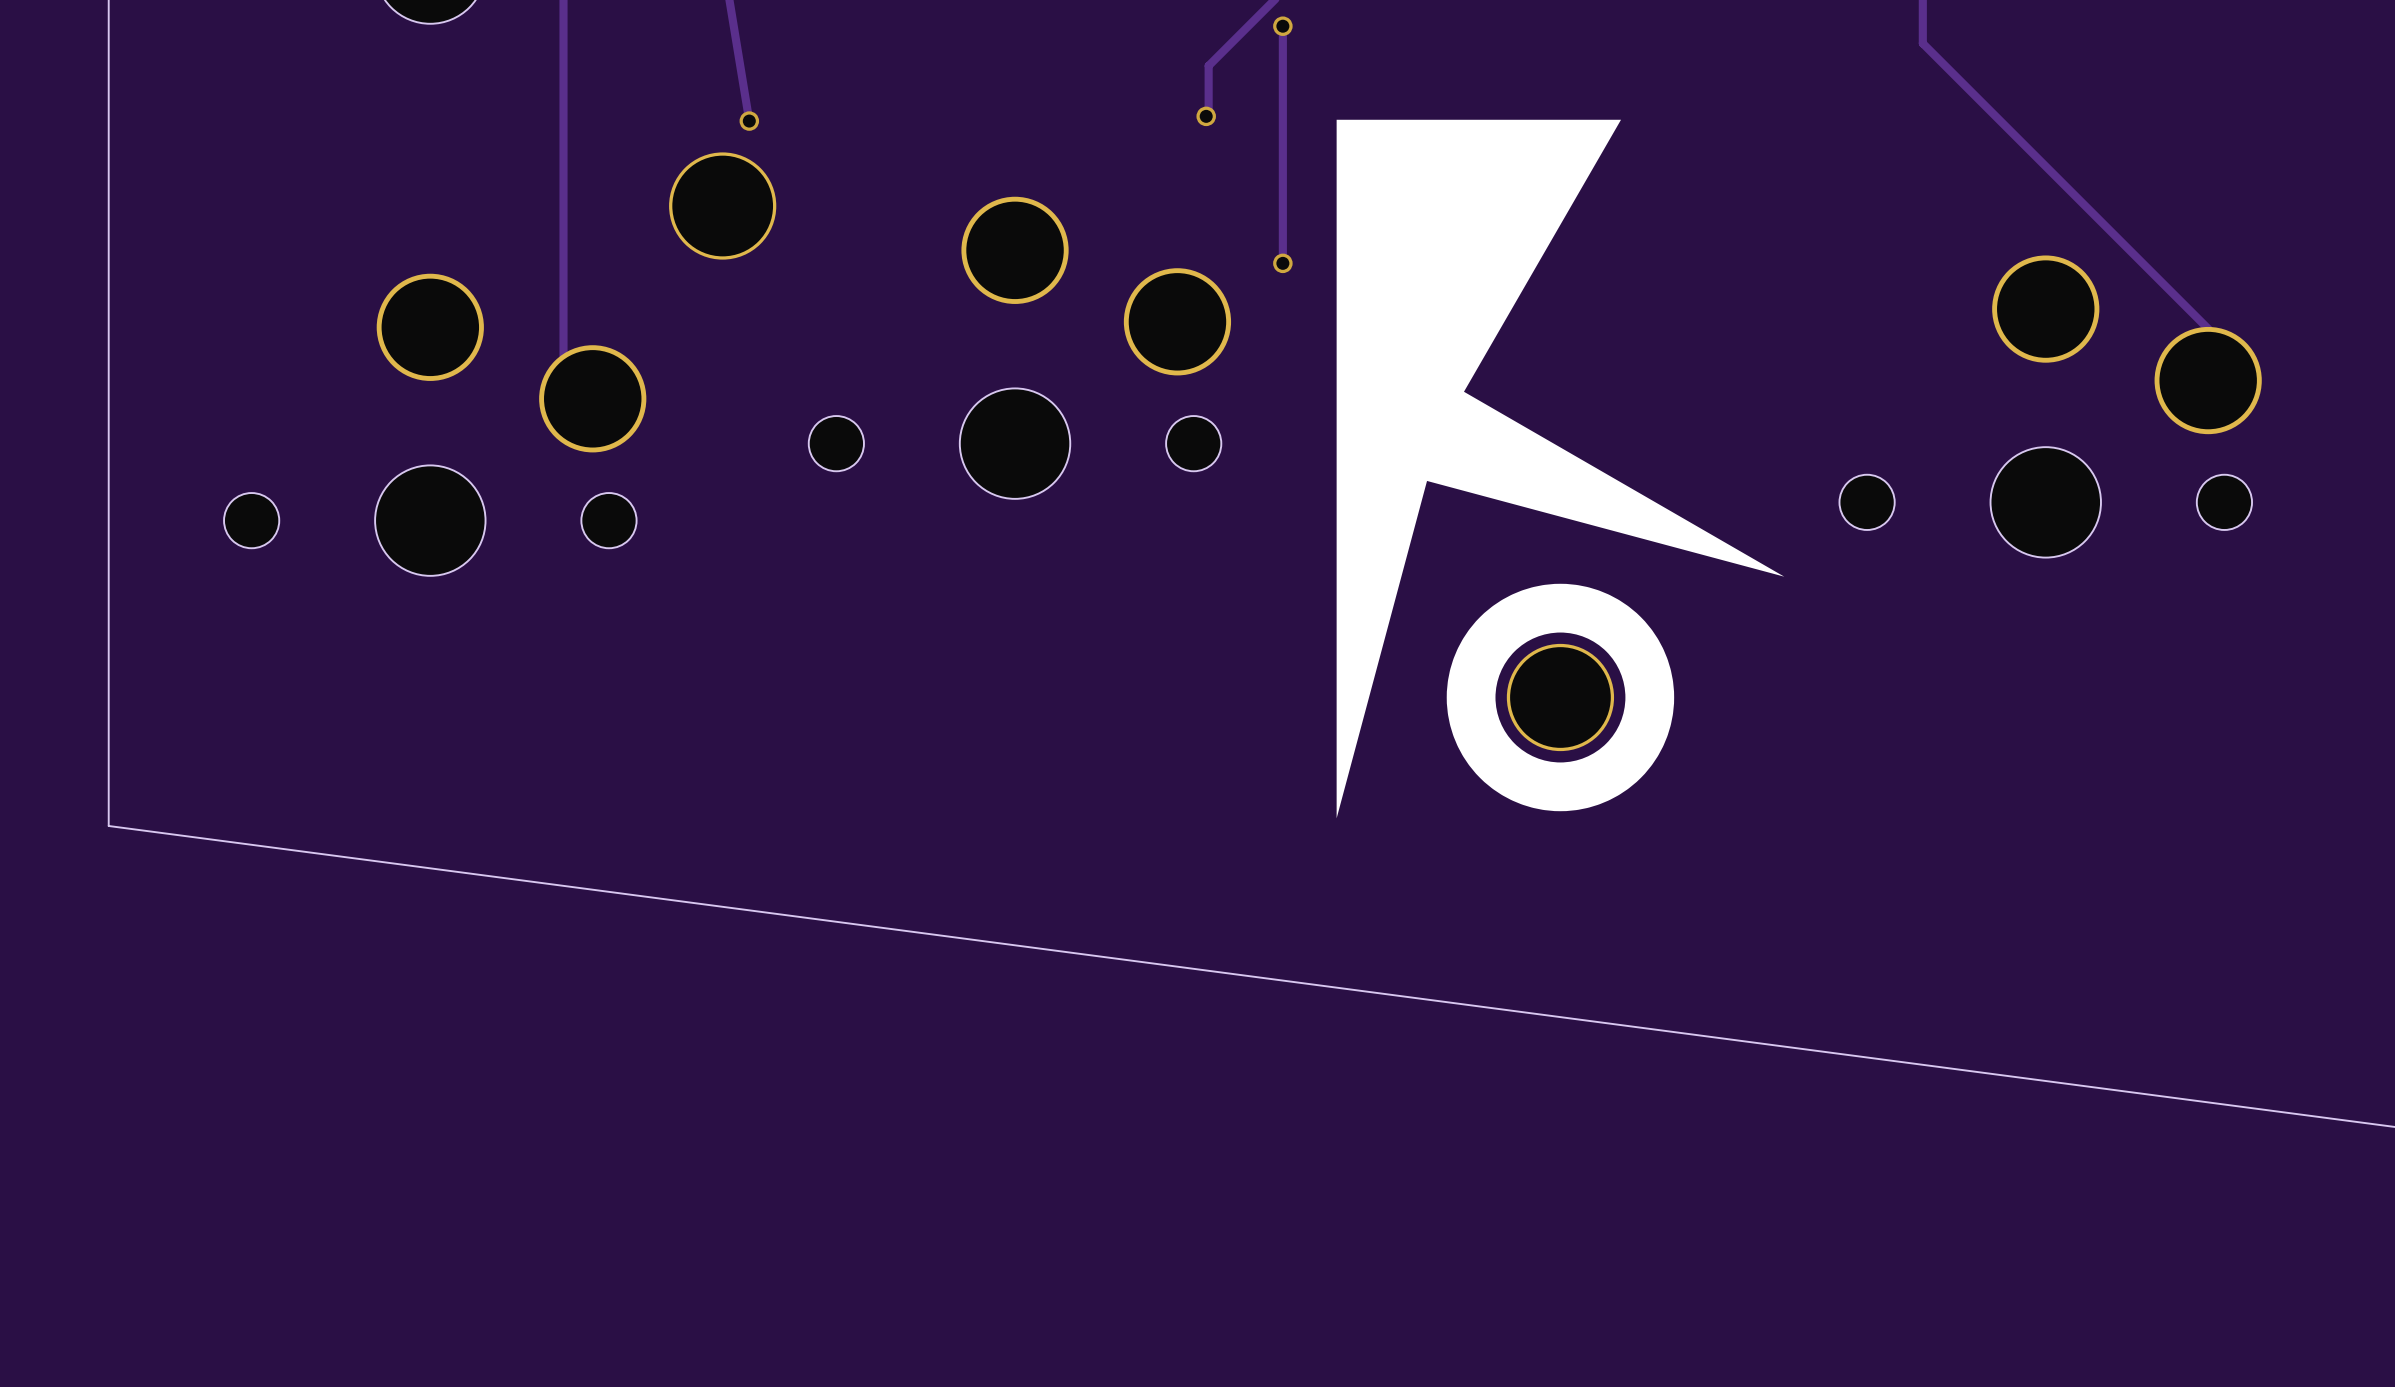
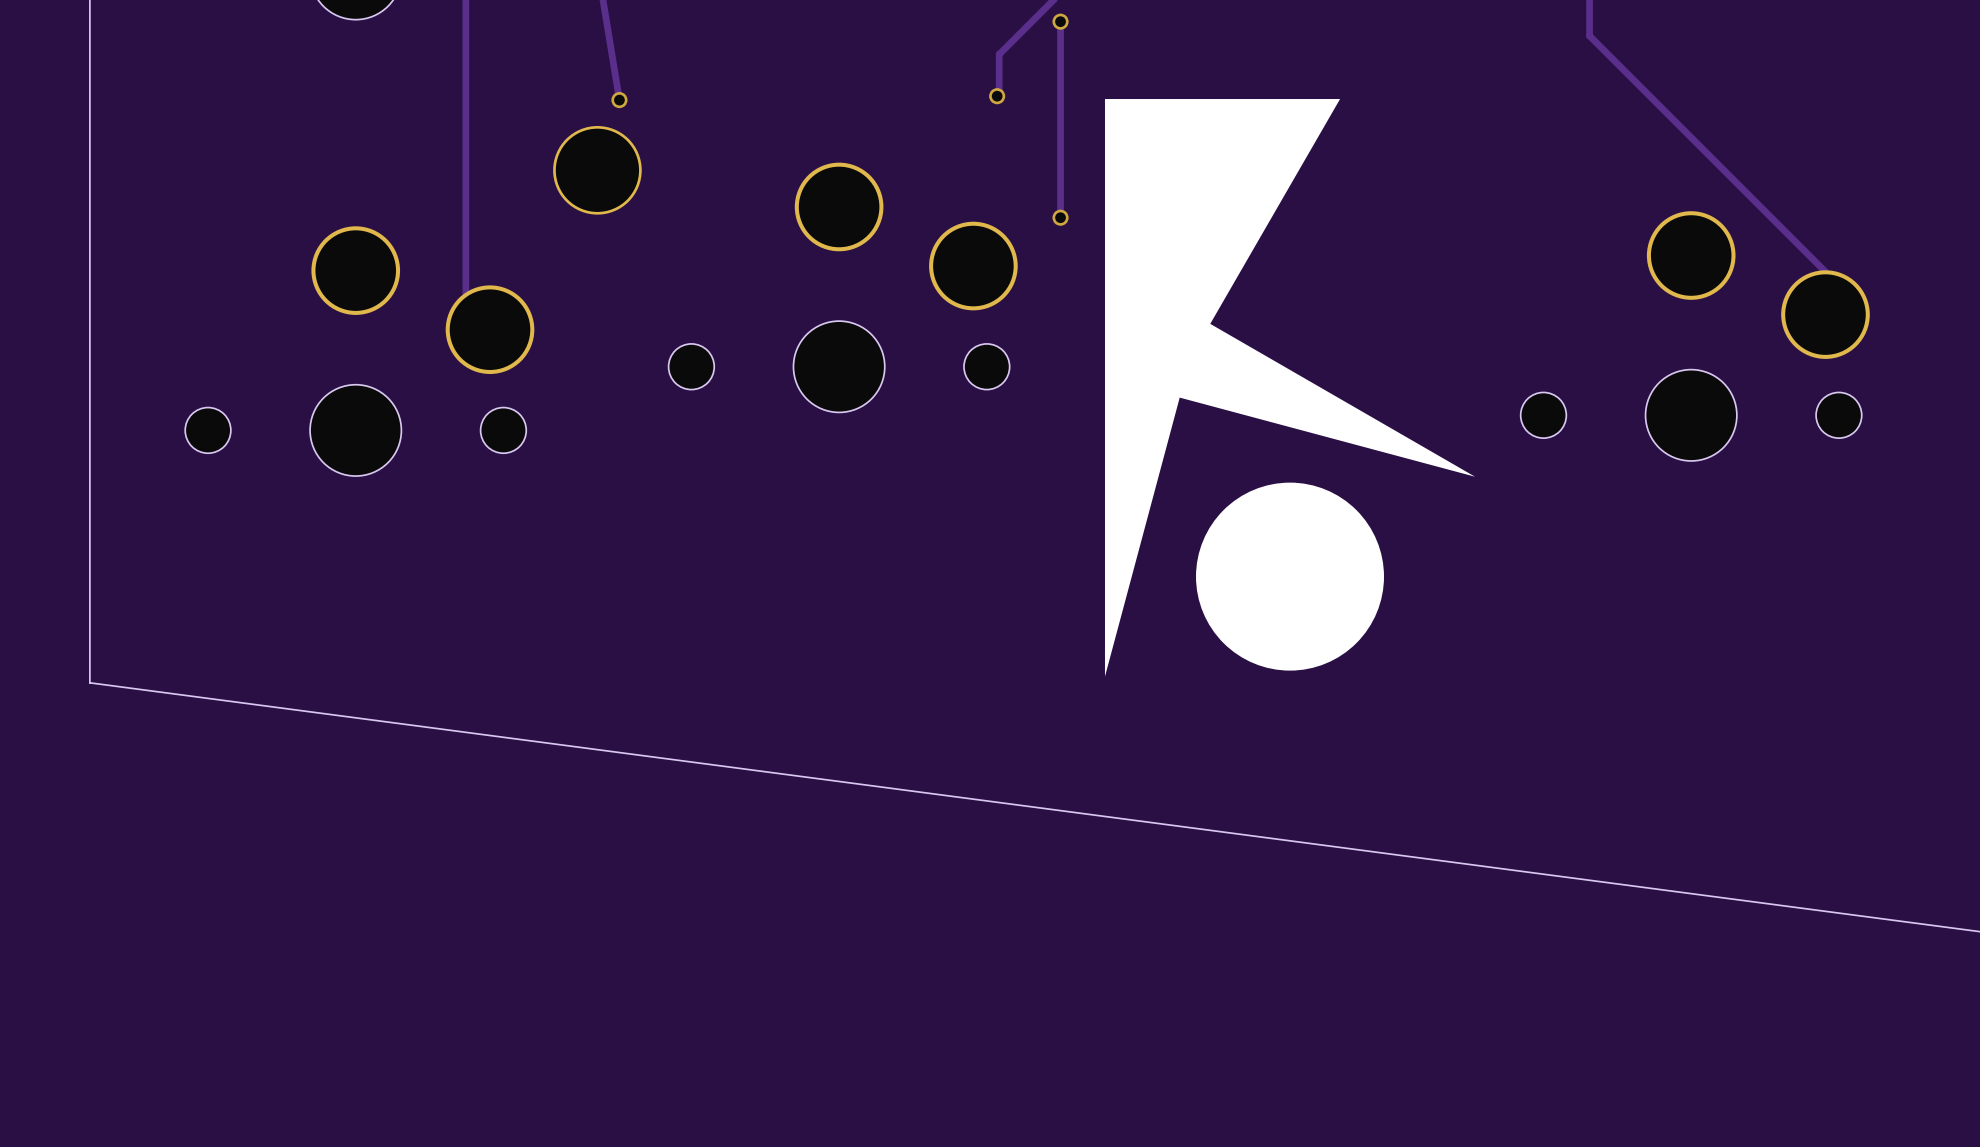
drawing shape: [1446, 583, 1675, 812] -> [1196, 482, 1384, 671]
part: (1560, 697) -> none

